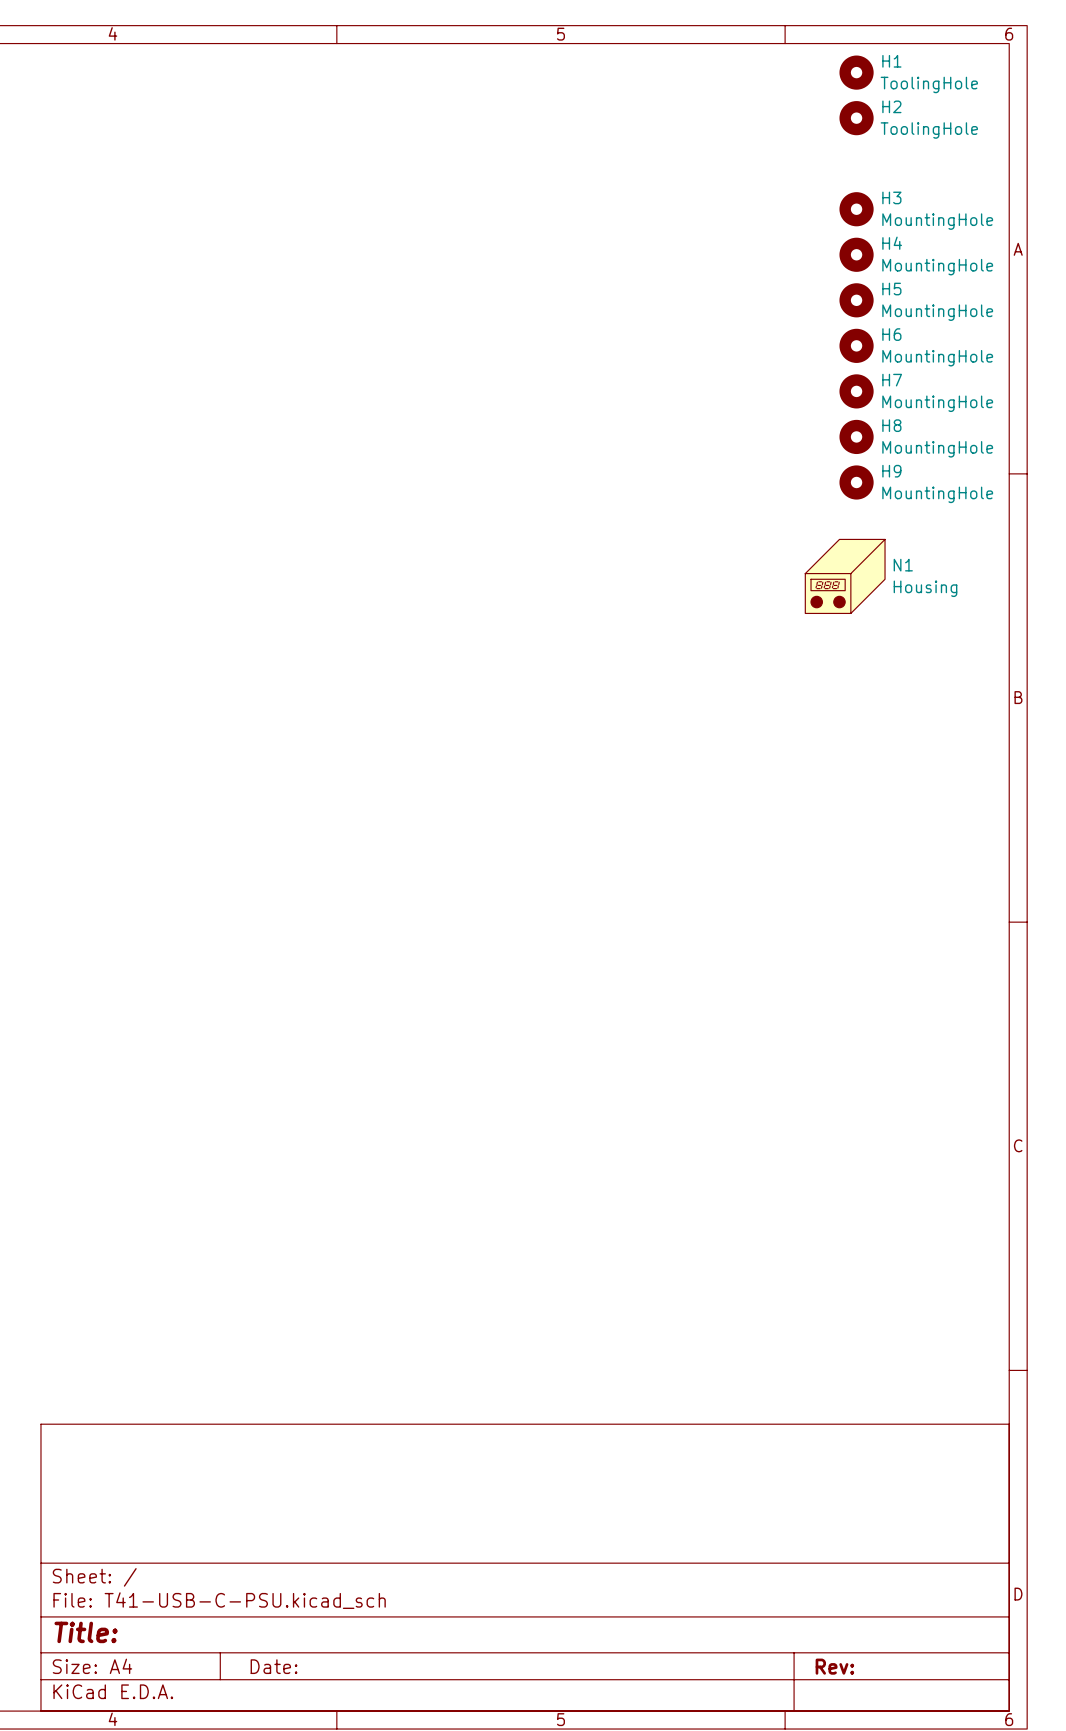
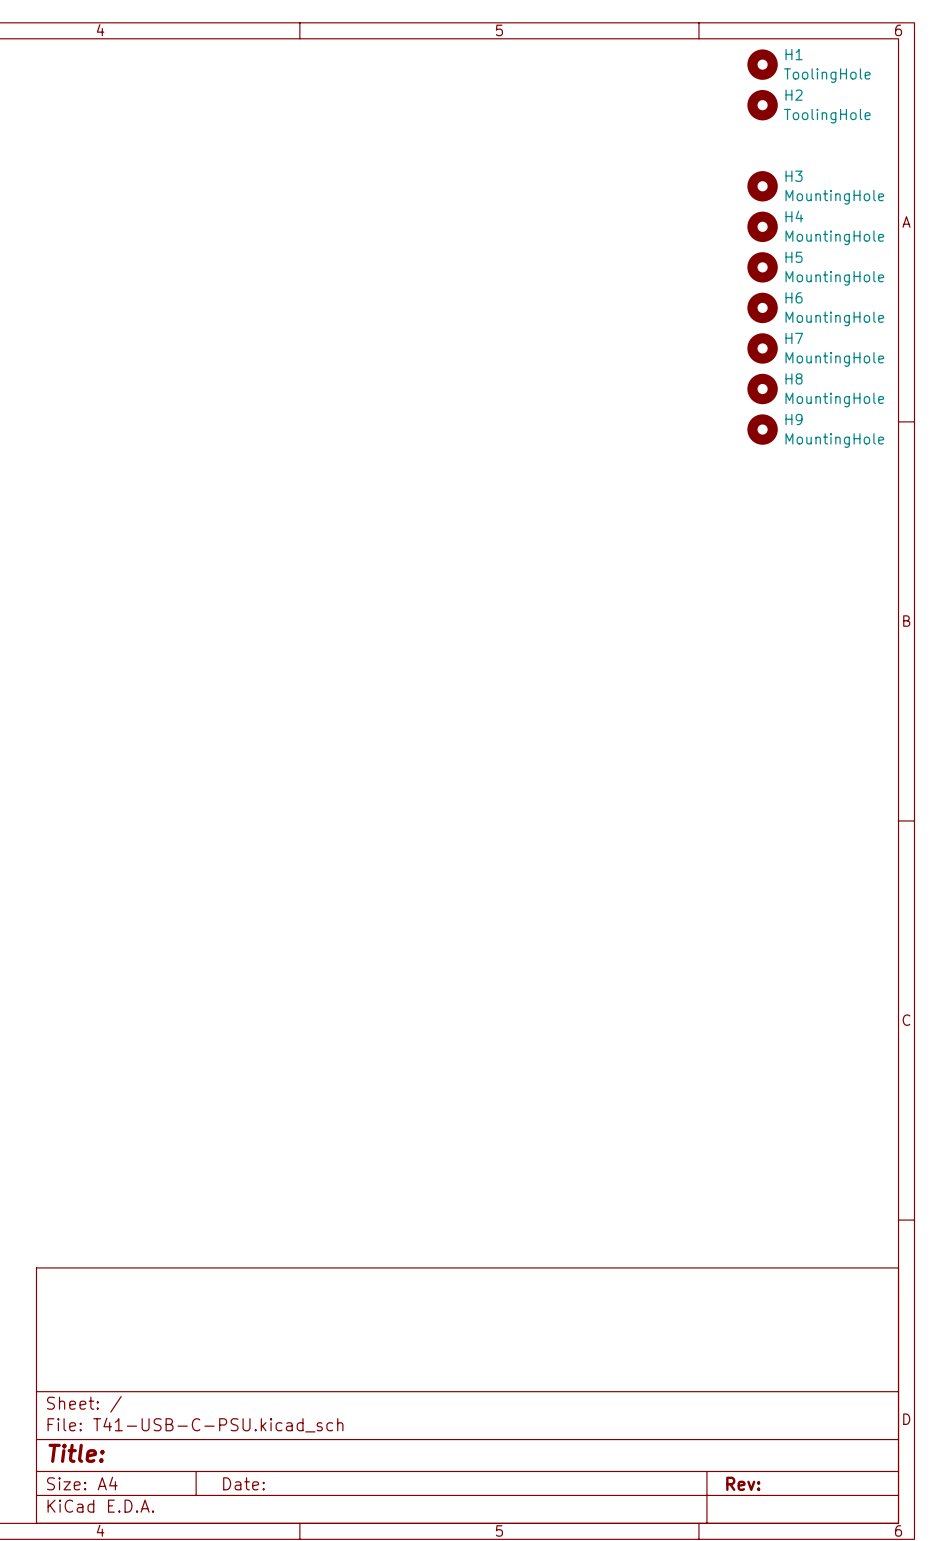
N1: Housing (845, 576) -> none

